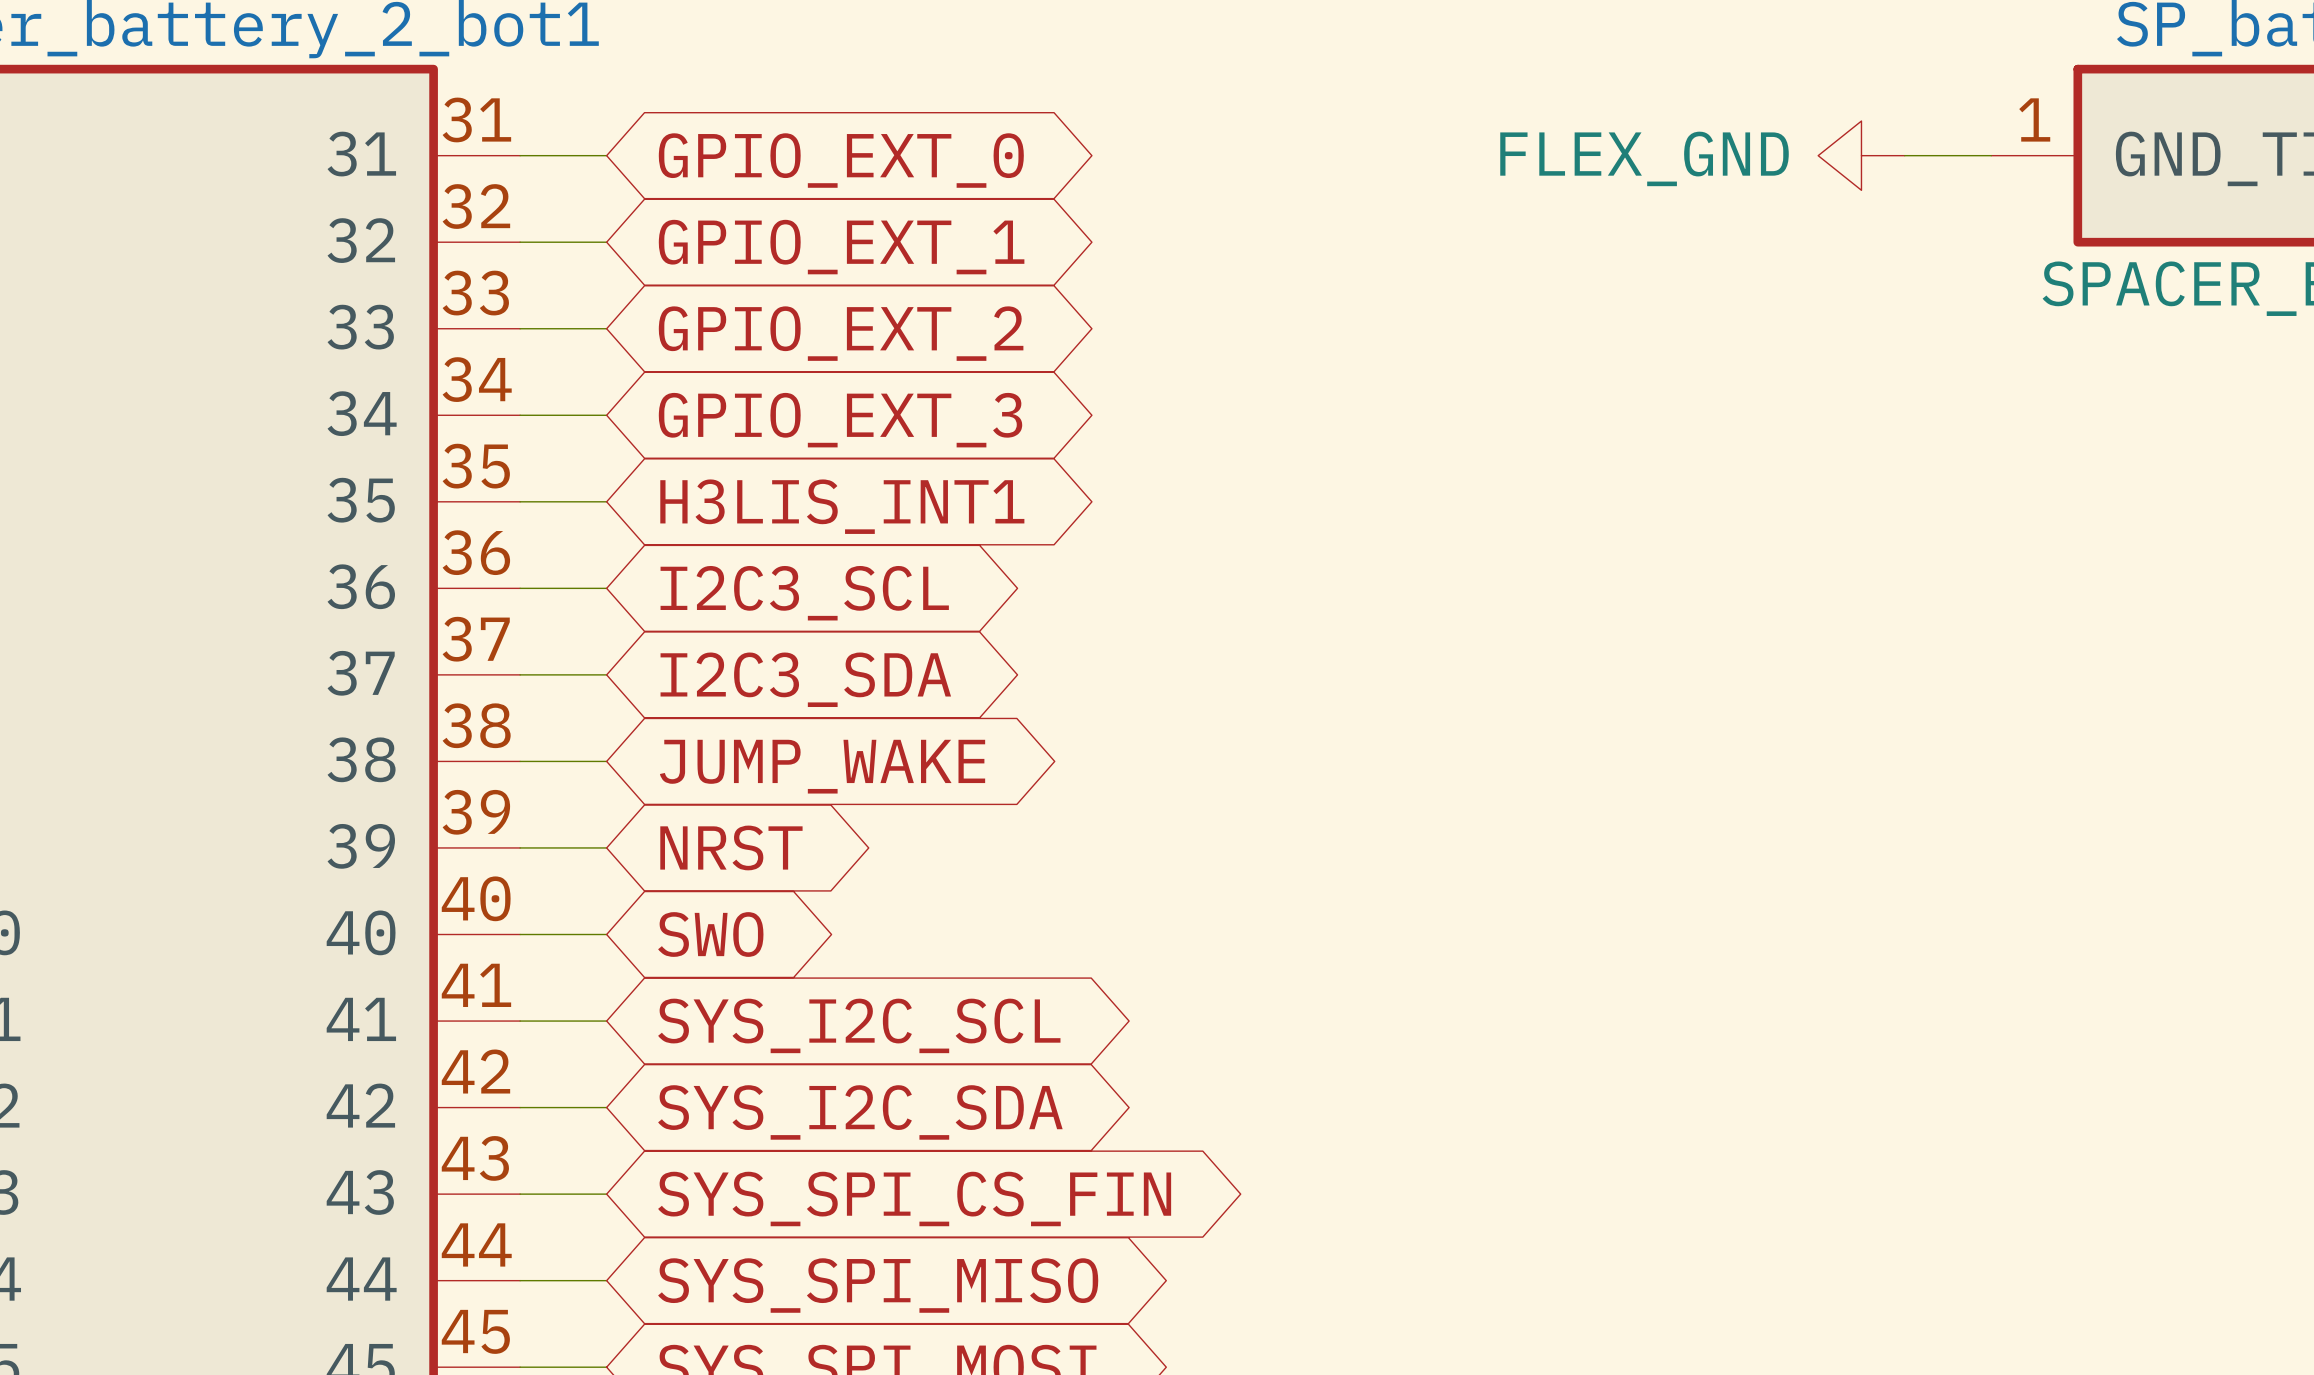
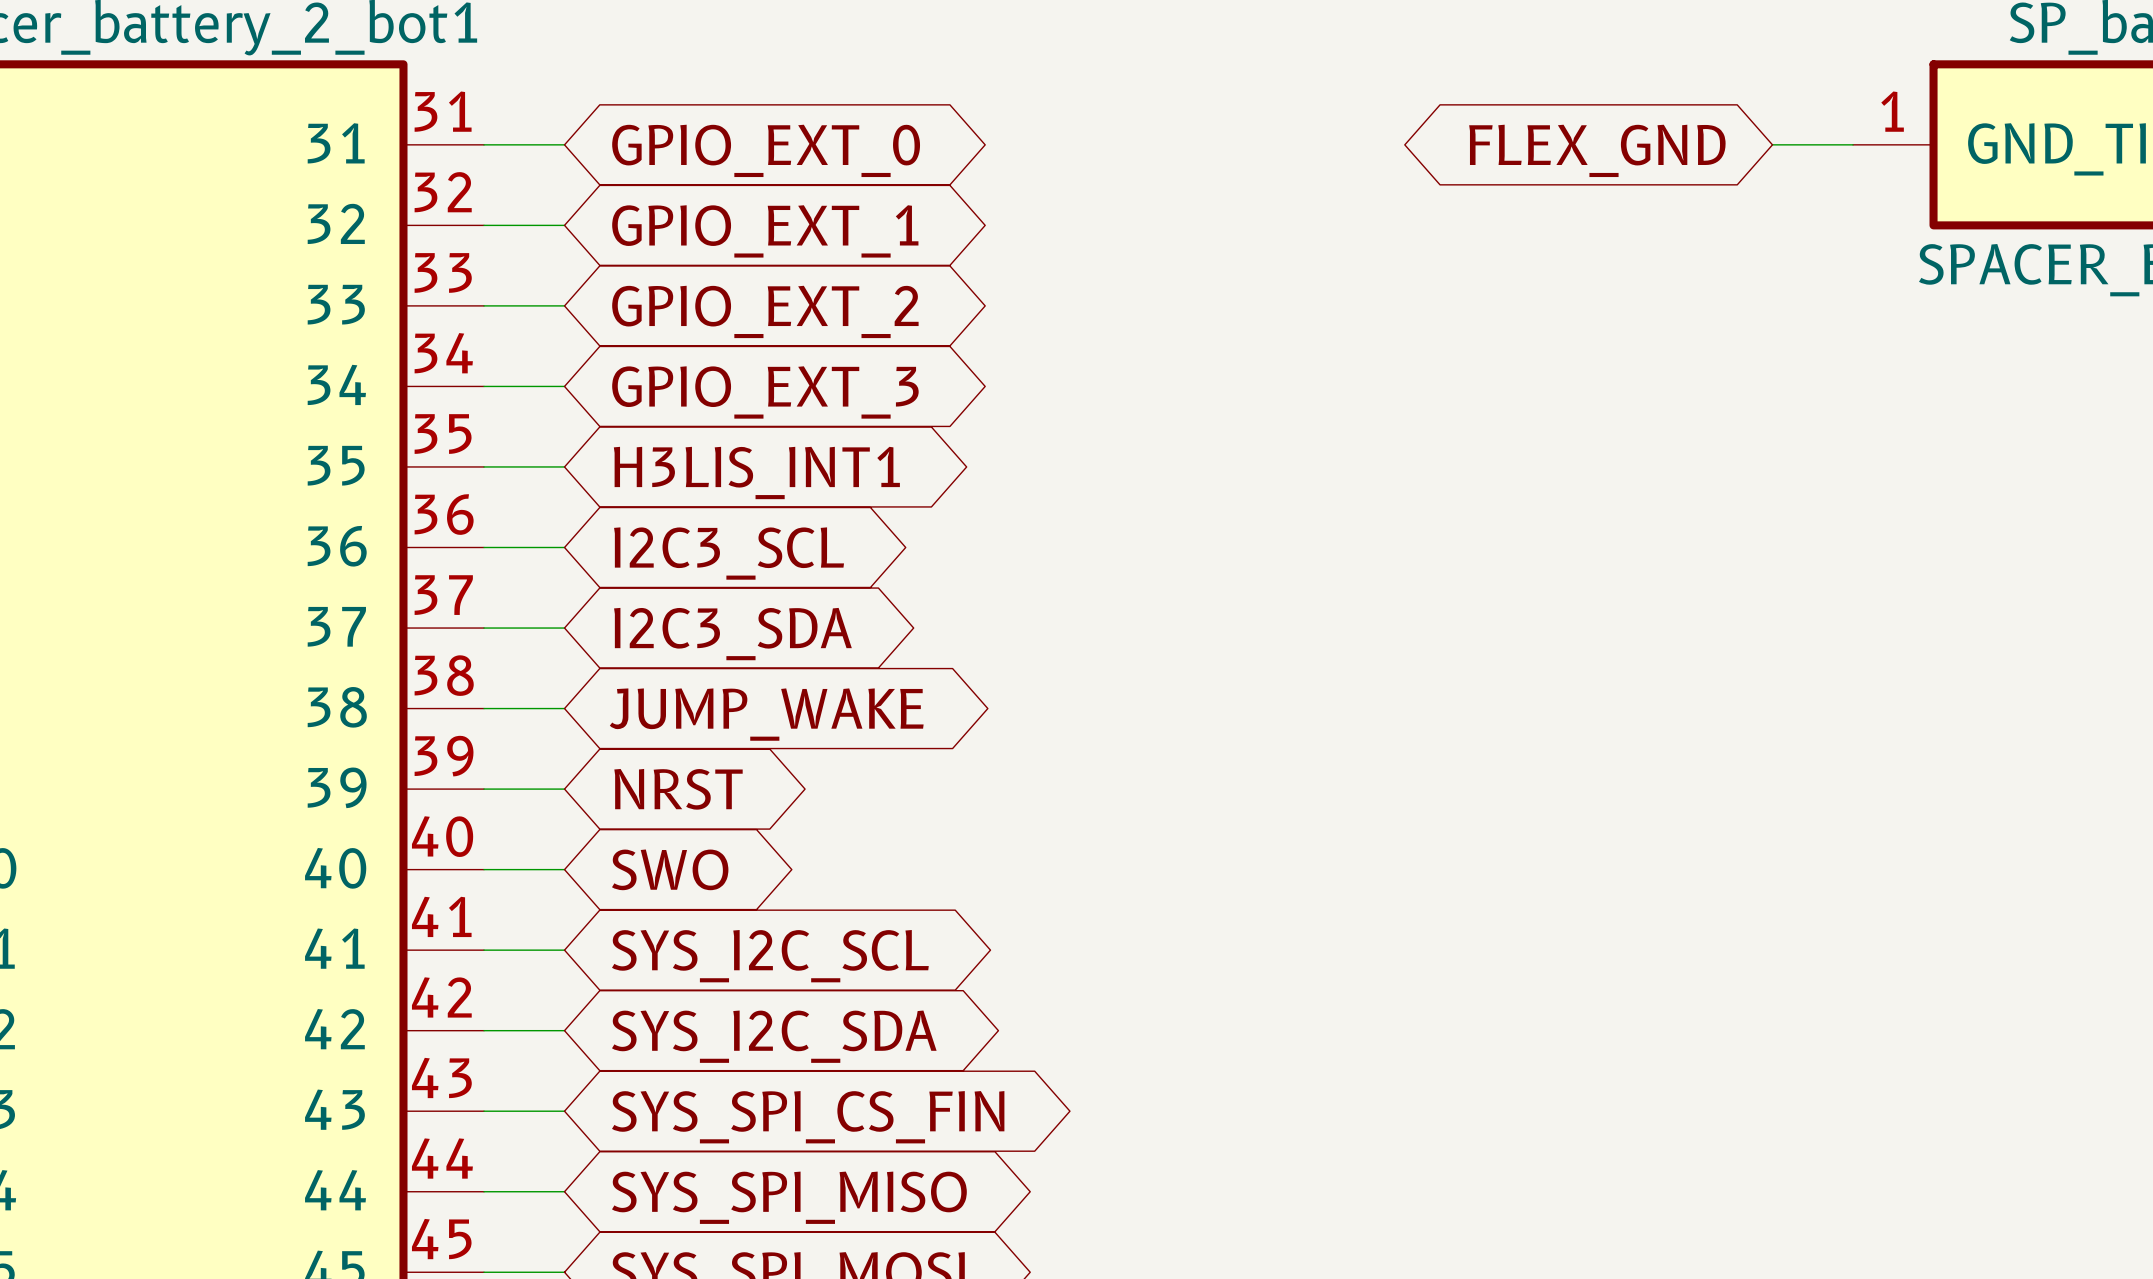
power symbol: FLEX_GND (1861, 155) -> none
global label: none -> FLEX_GND (1597, 150)

